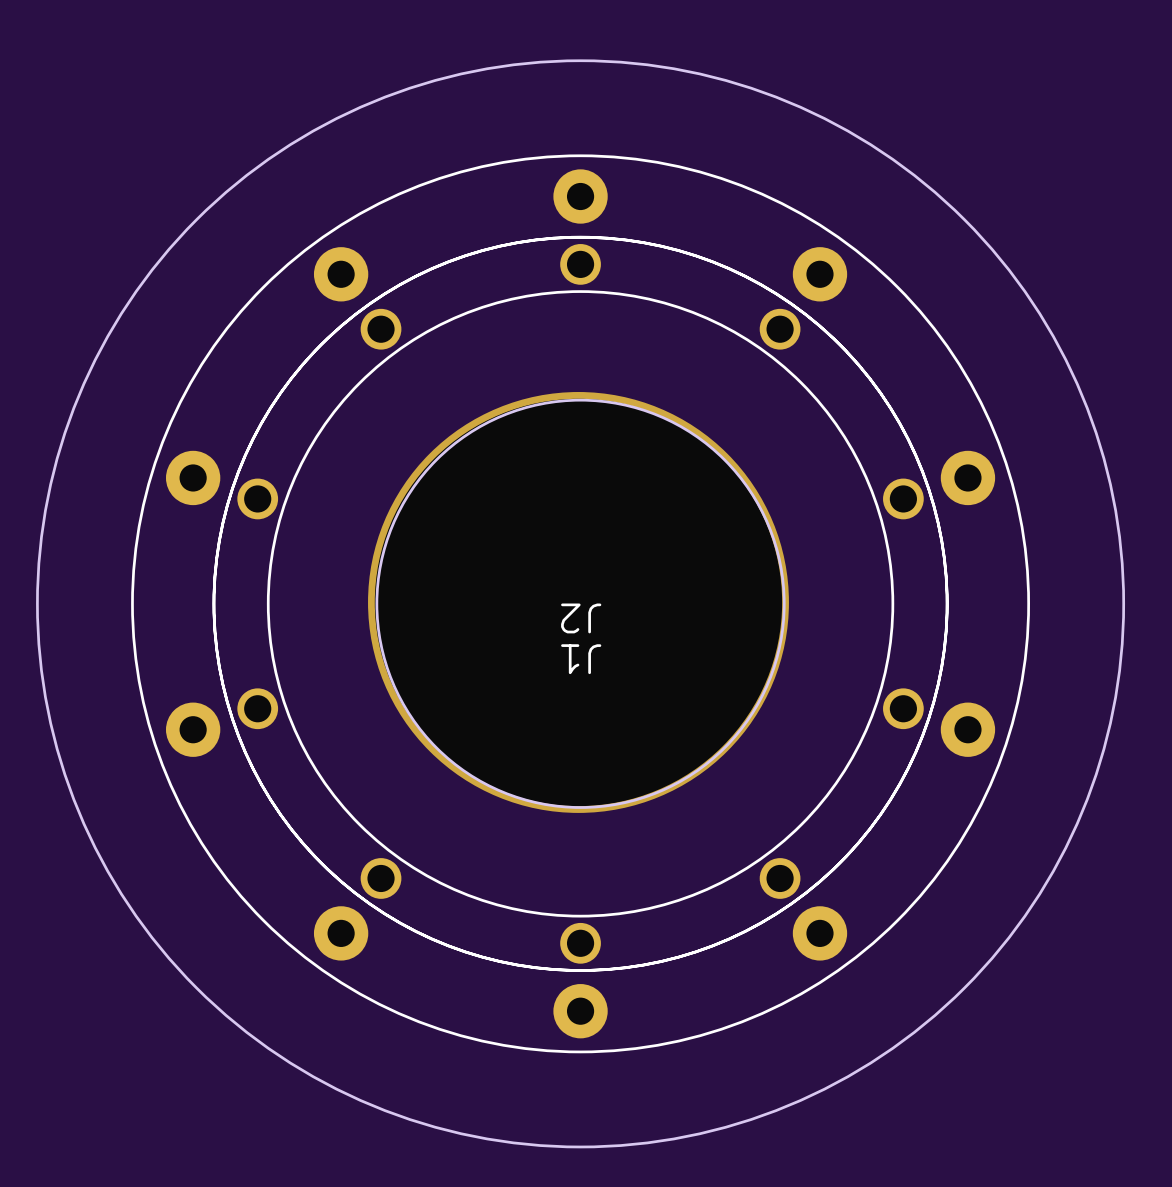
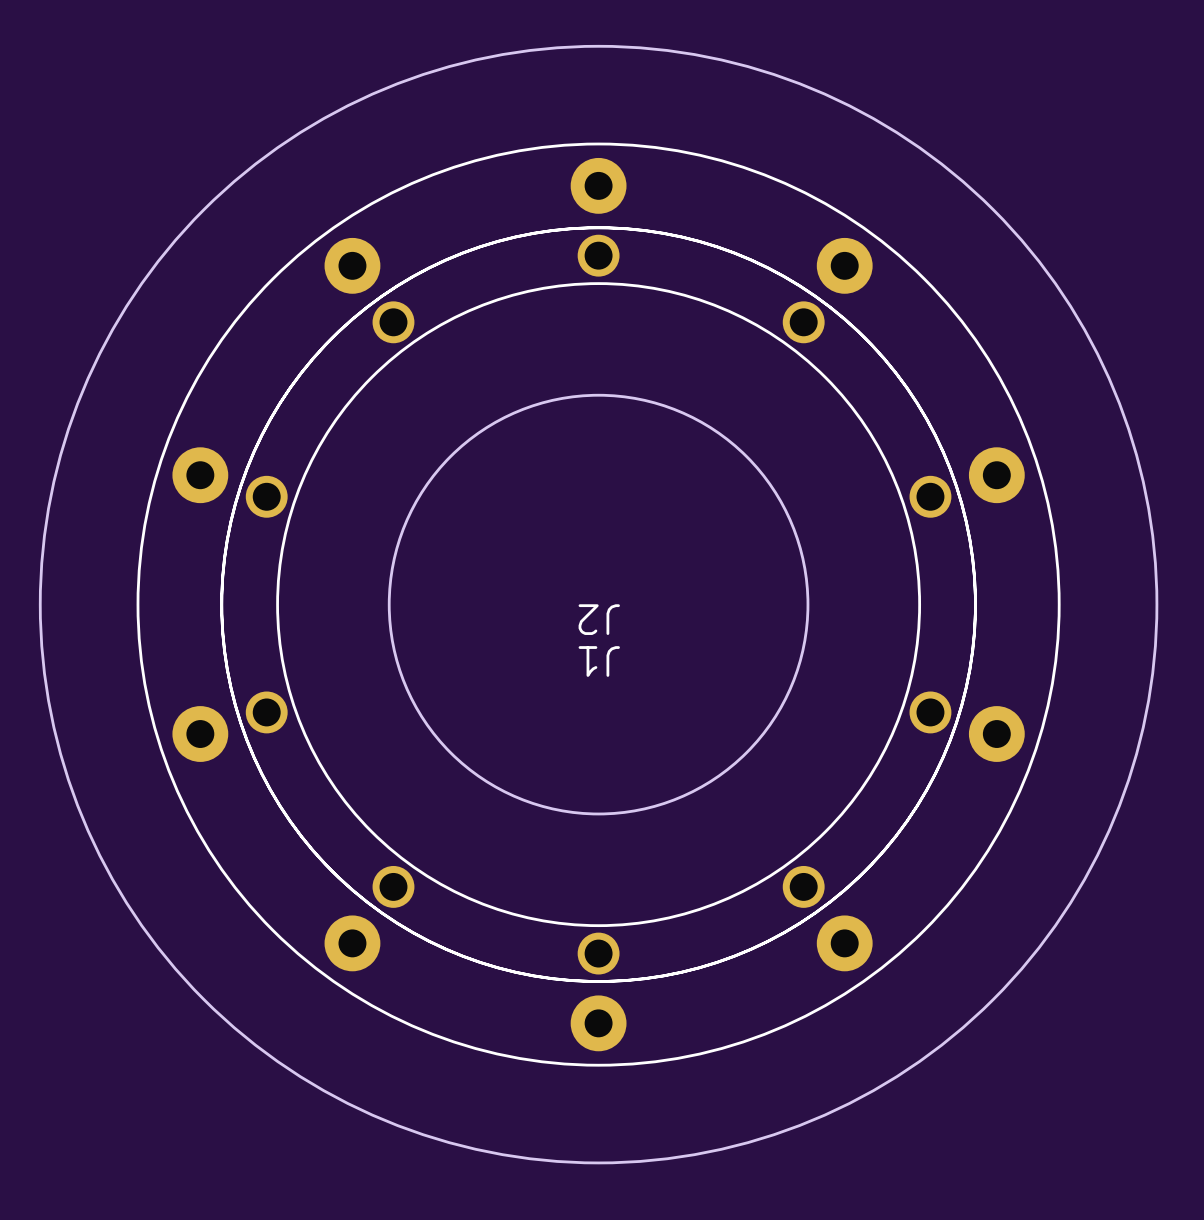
via: (578, 602) -> none

